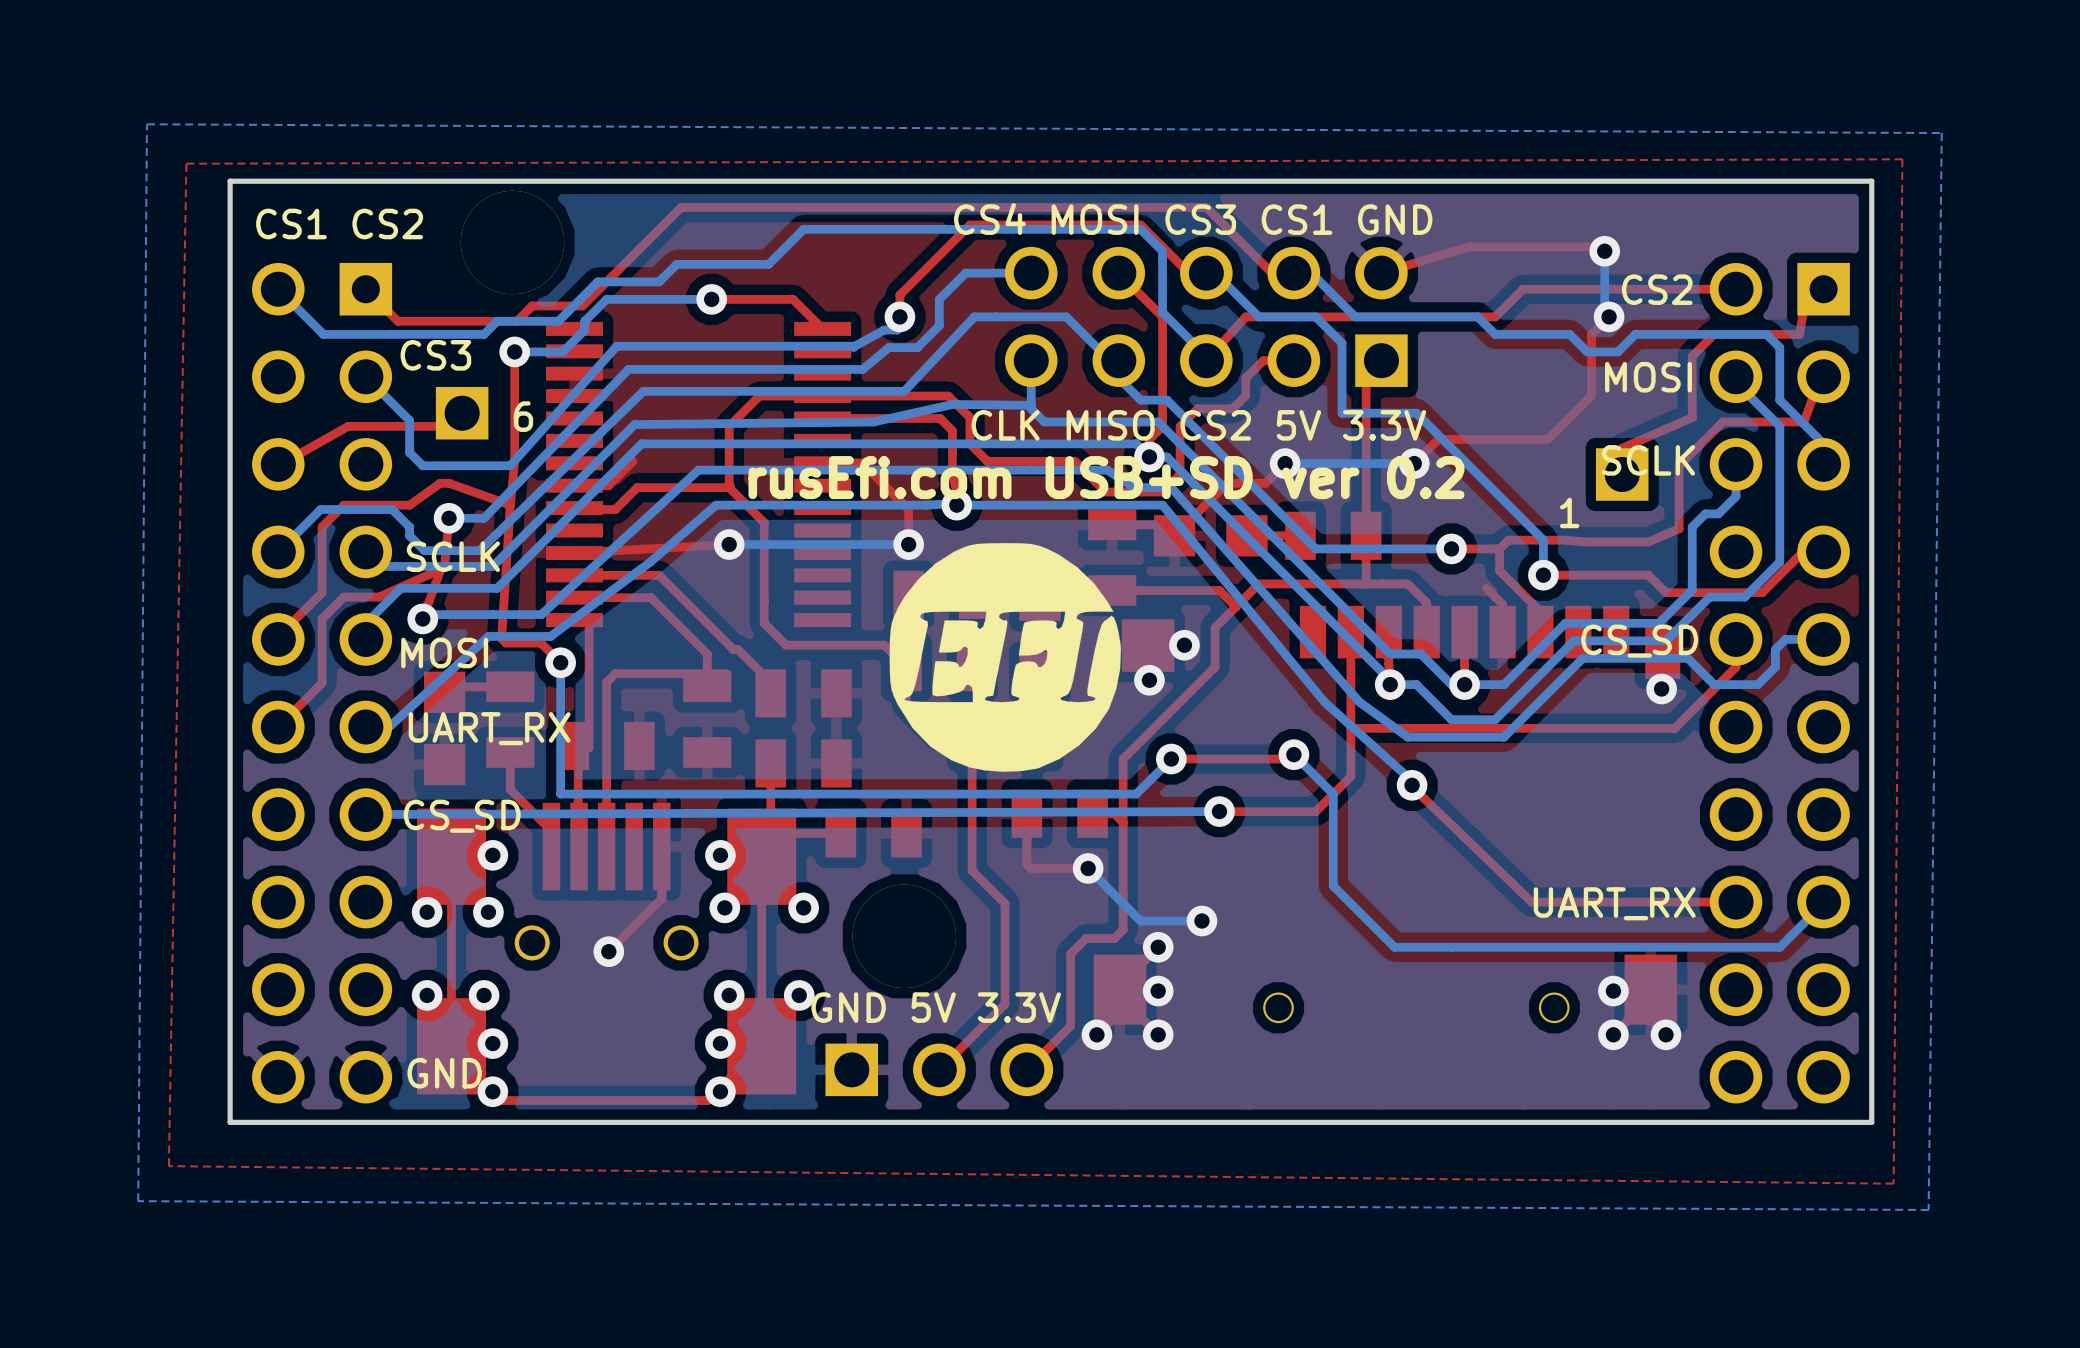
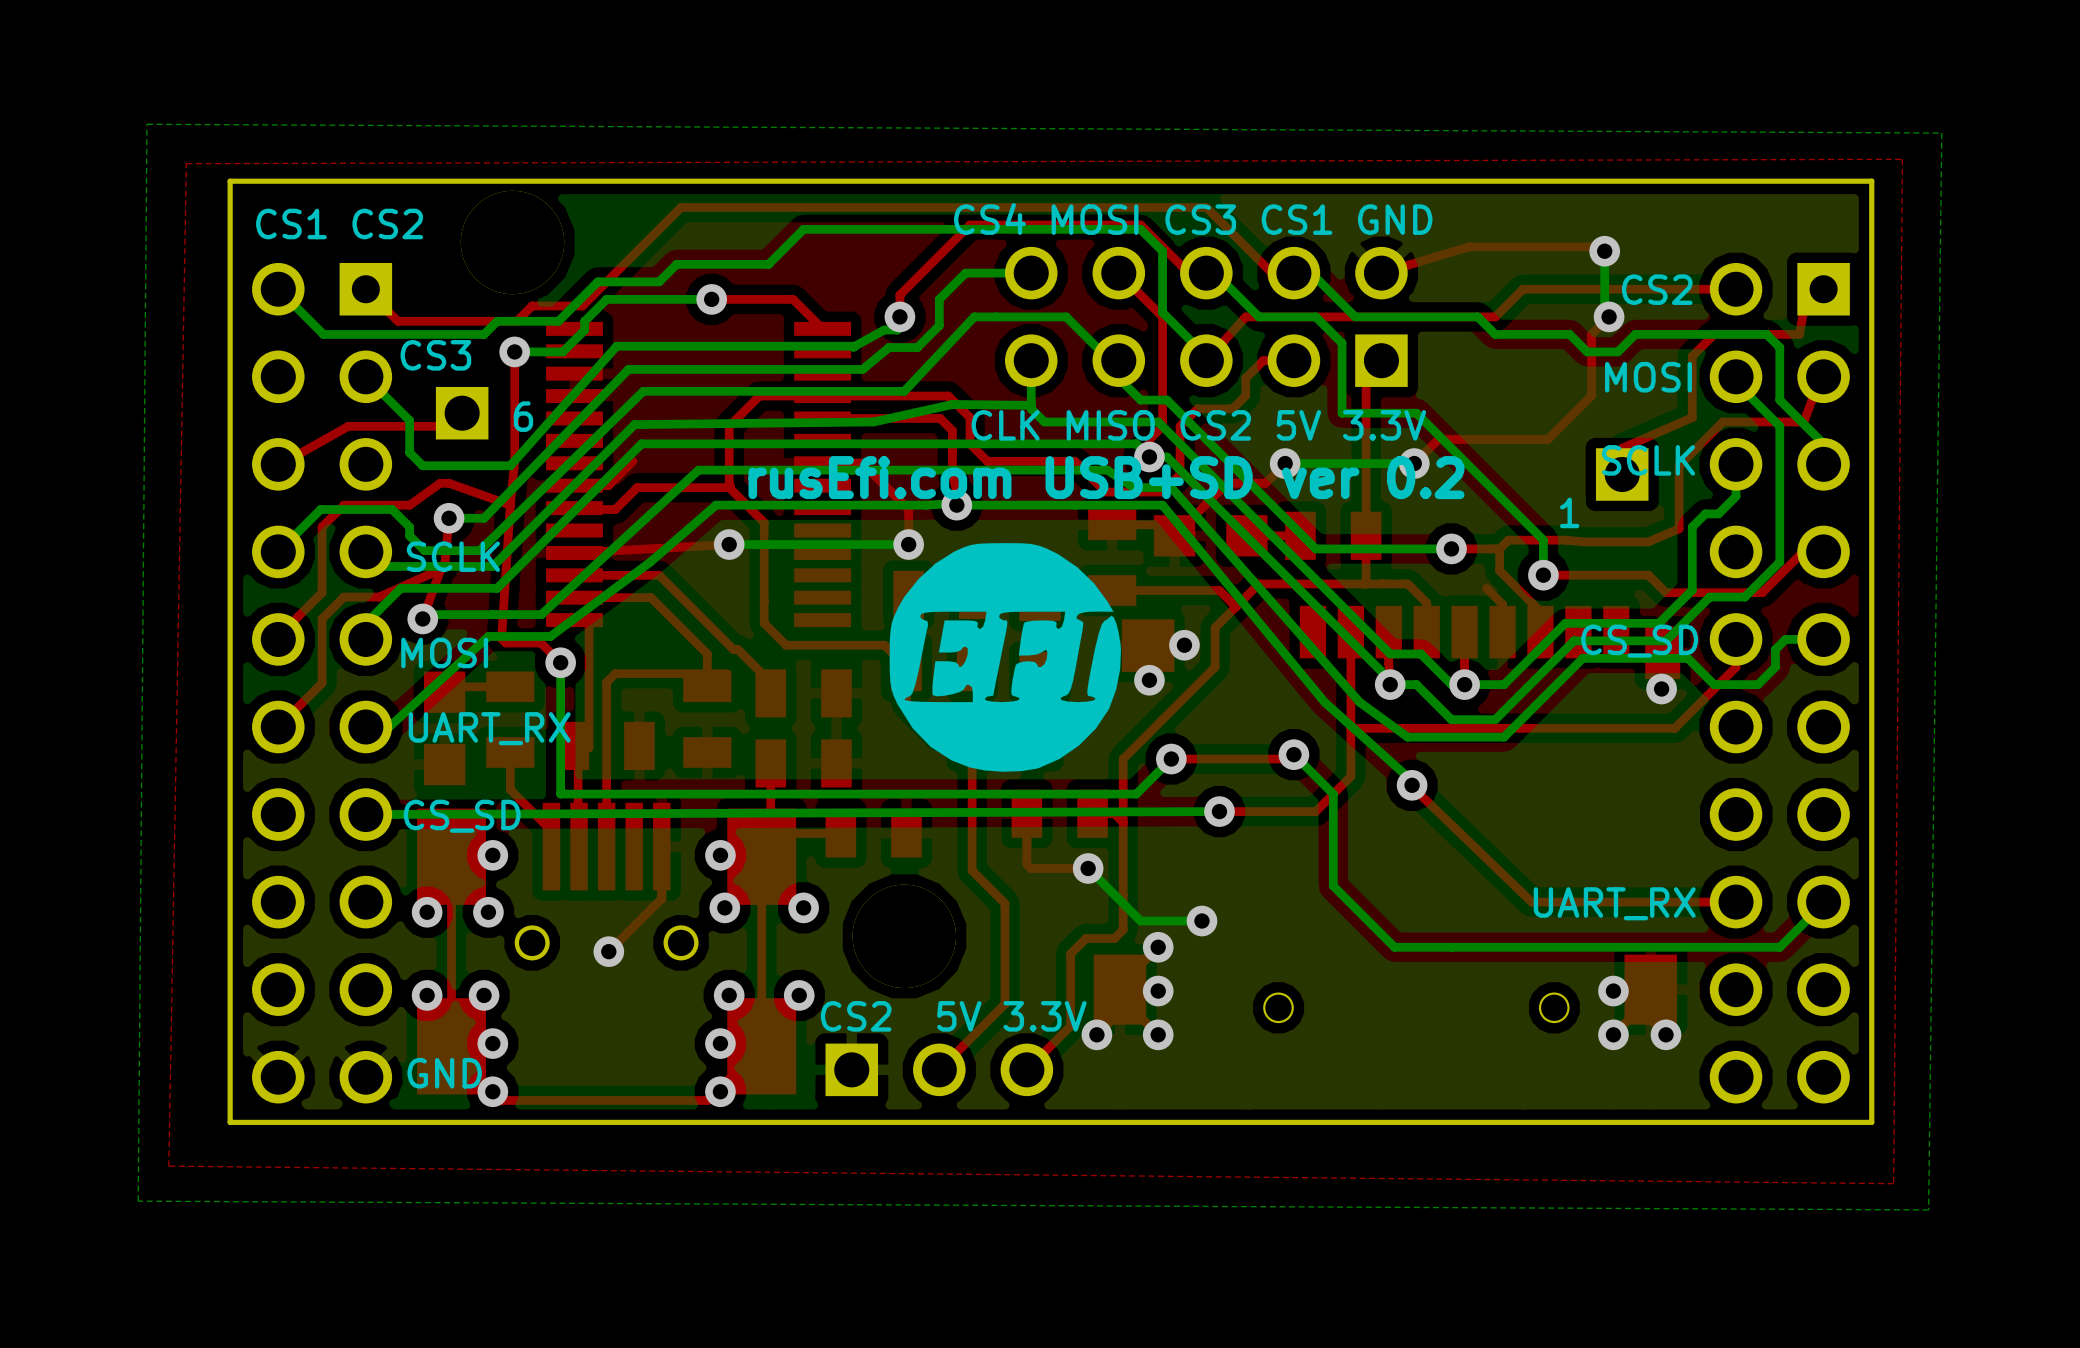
text: GND 5V 3.3V (936, 1007) -> CS2 5V 3.3V (953, 1016)

